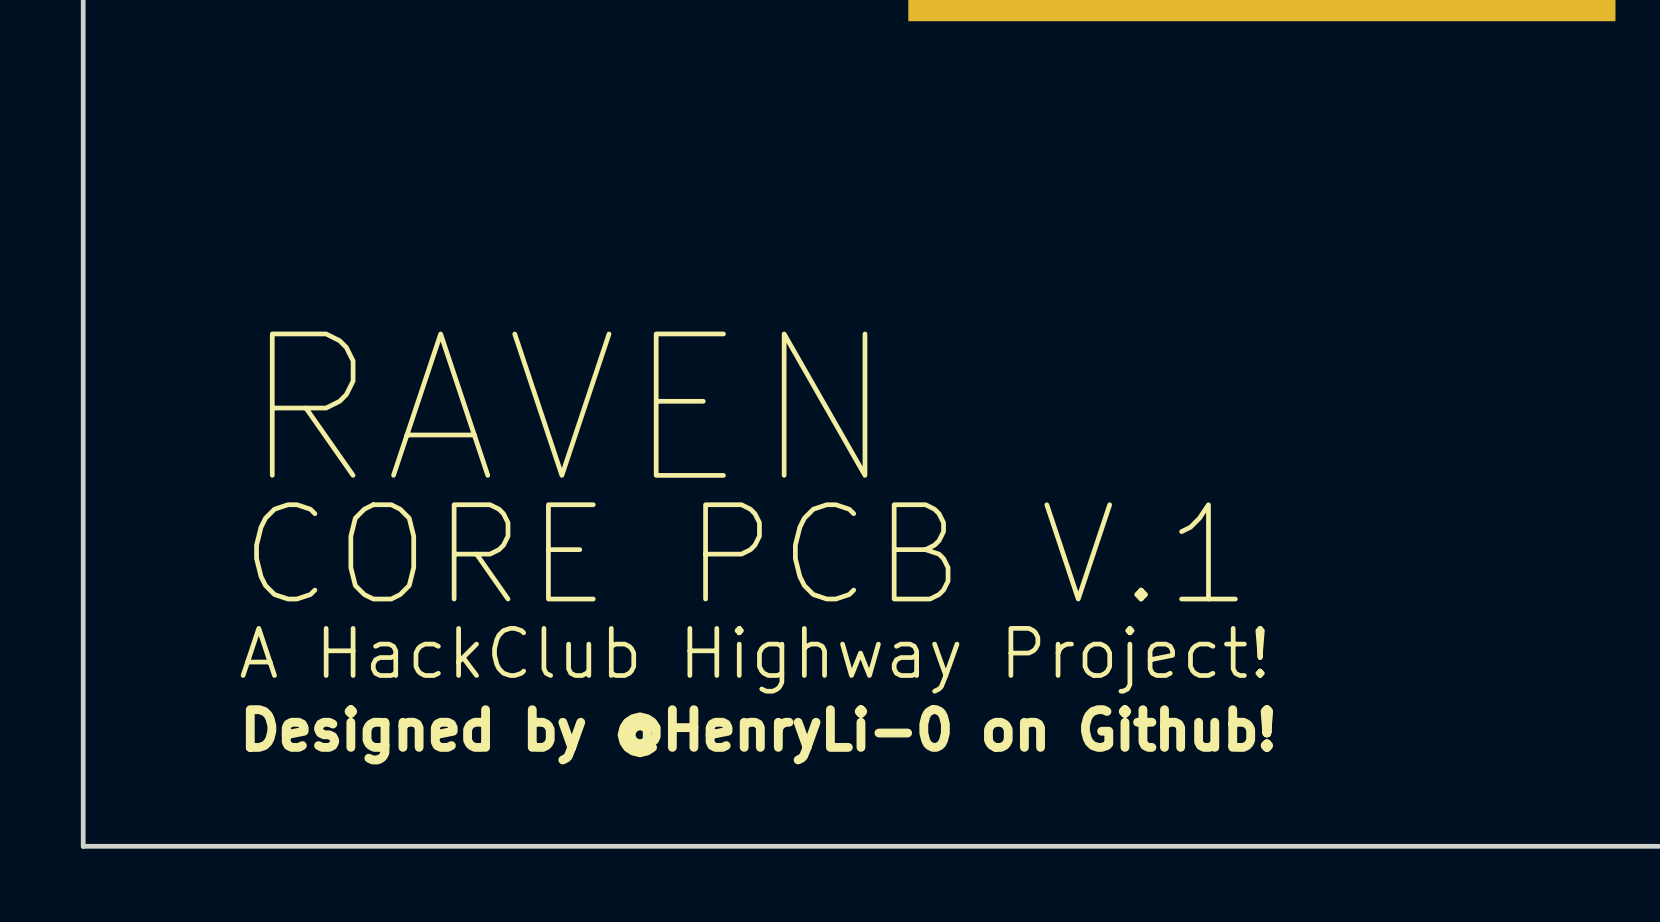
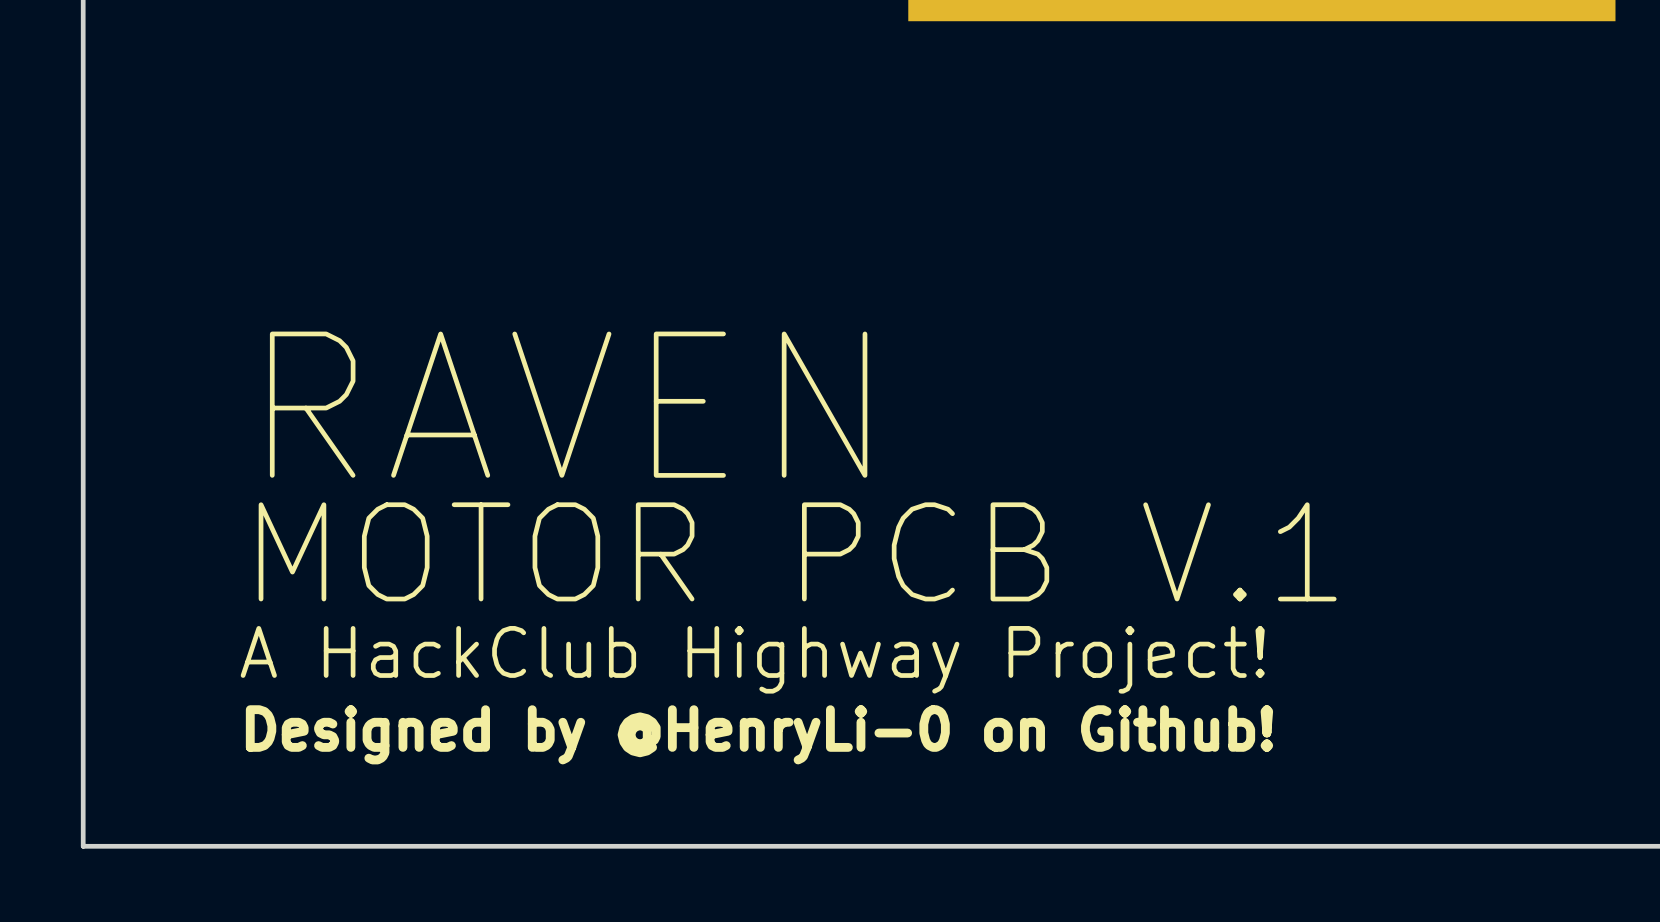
text: CORE PCB V.1 (745, 551) -> MOTOR PCB V.1 (797, 551)

